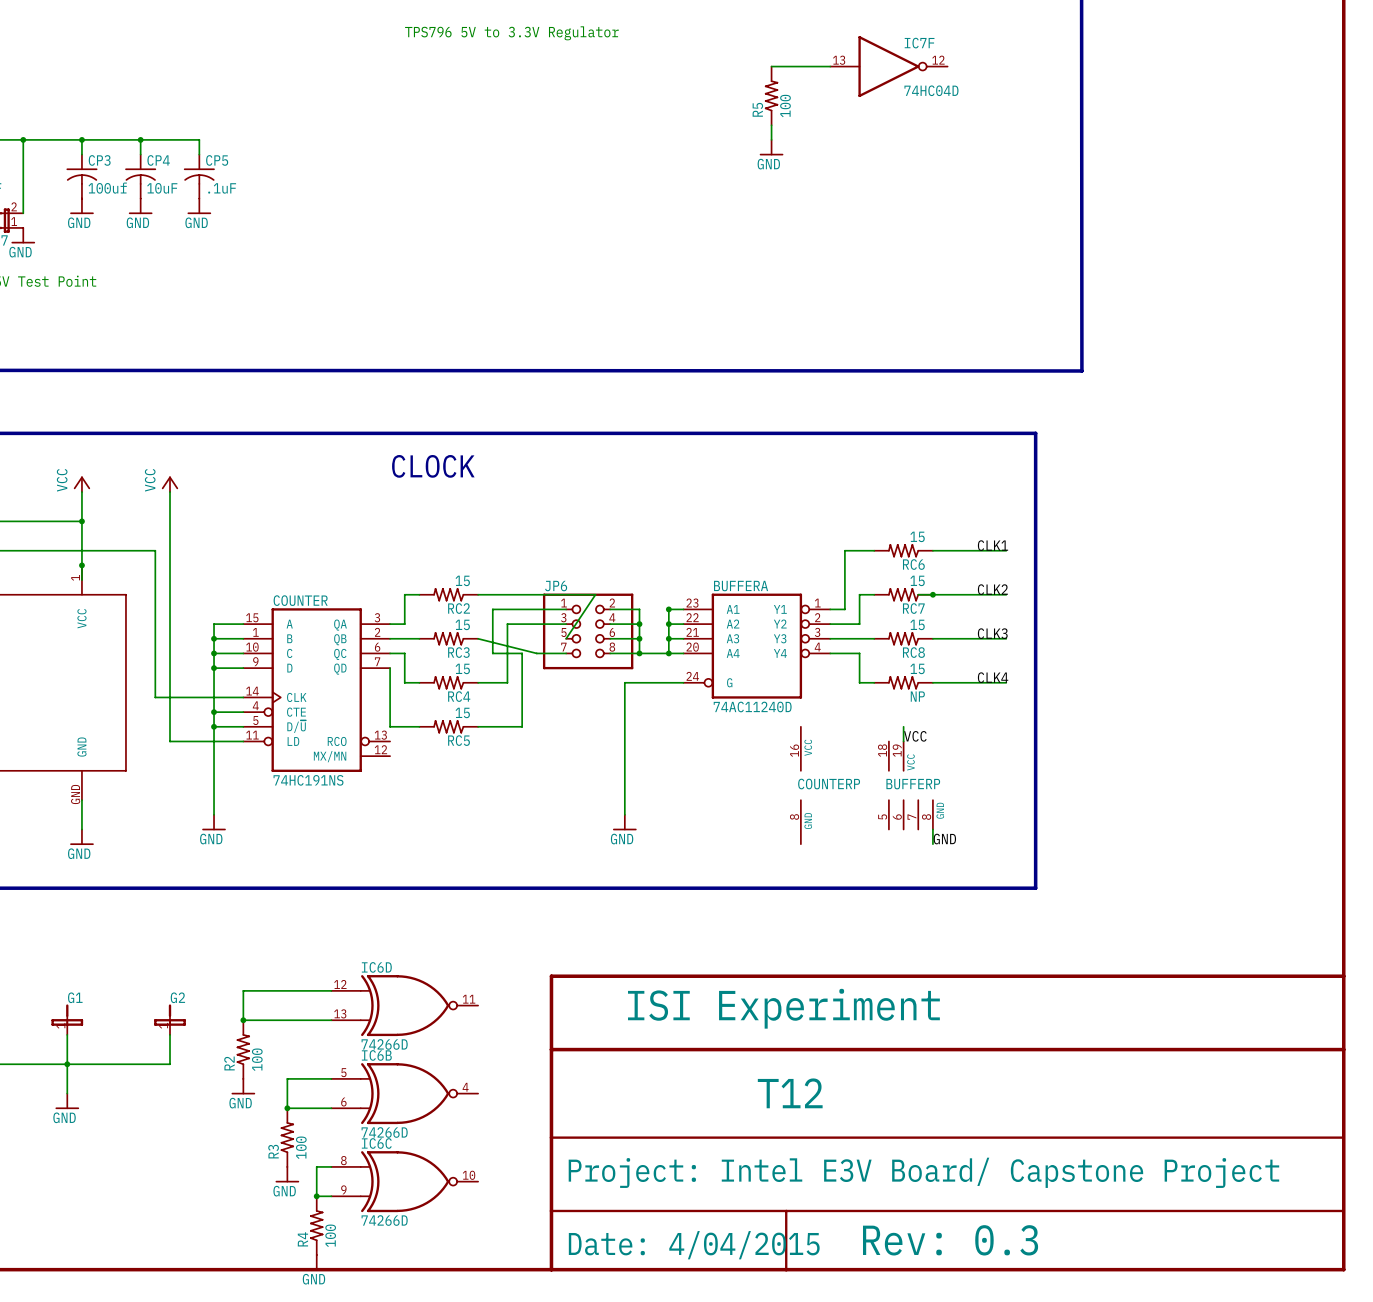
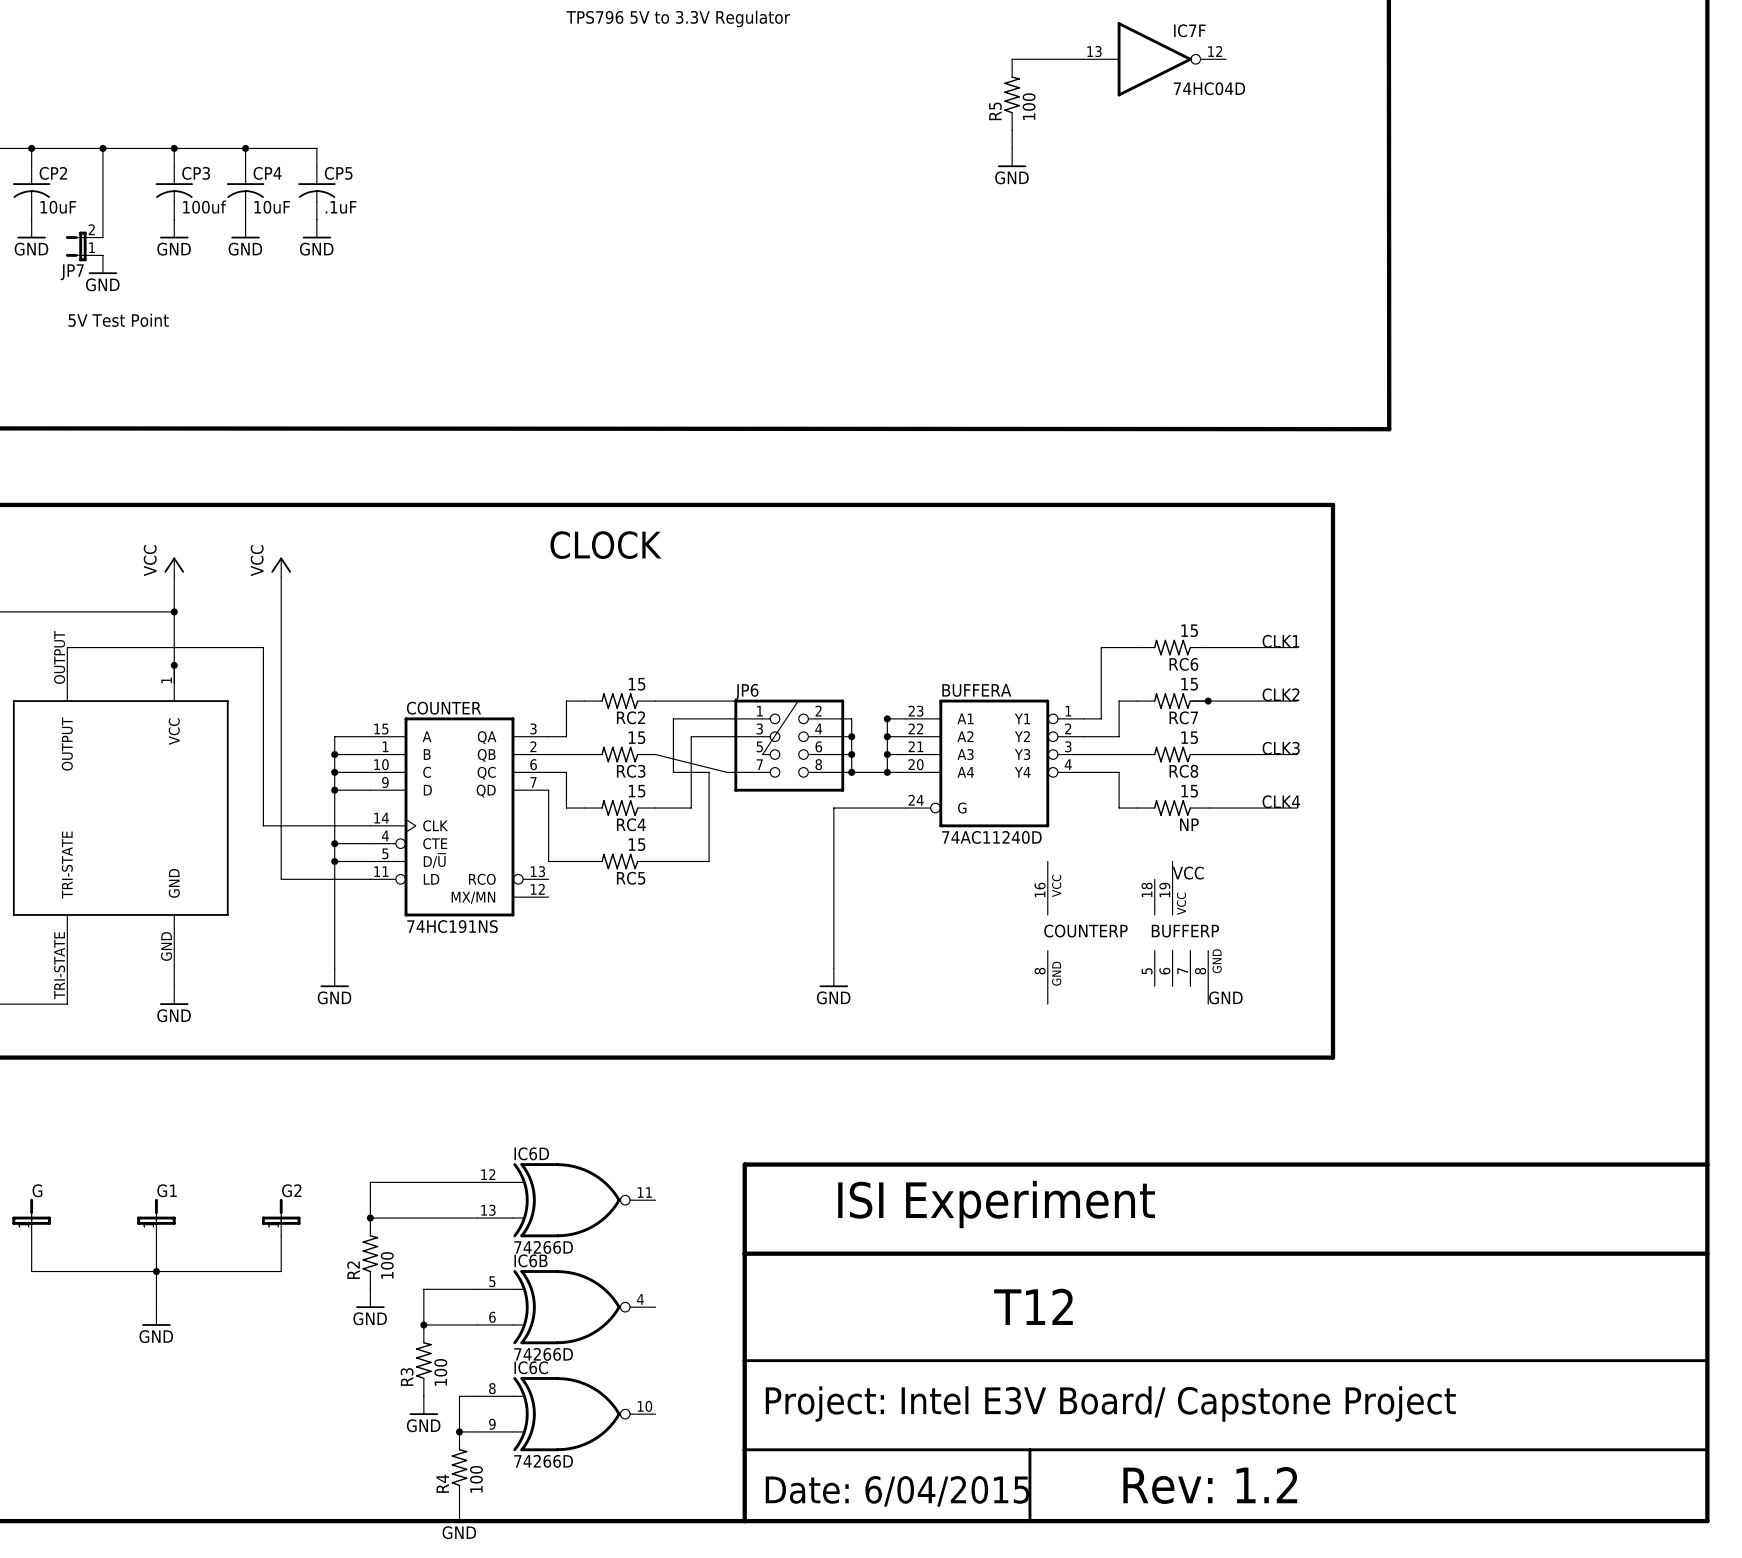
text: Rev: 0.3 (950, 1240) -> Rev: 1.2 (1210, 1485)
text: Date: 4/04/2015 (694, 1245) -> Date: 6/04/2015 (897, 1491)

